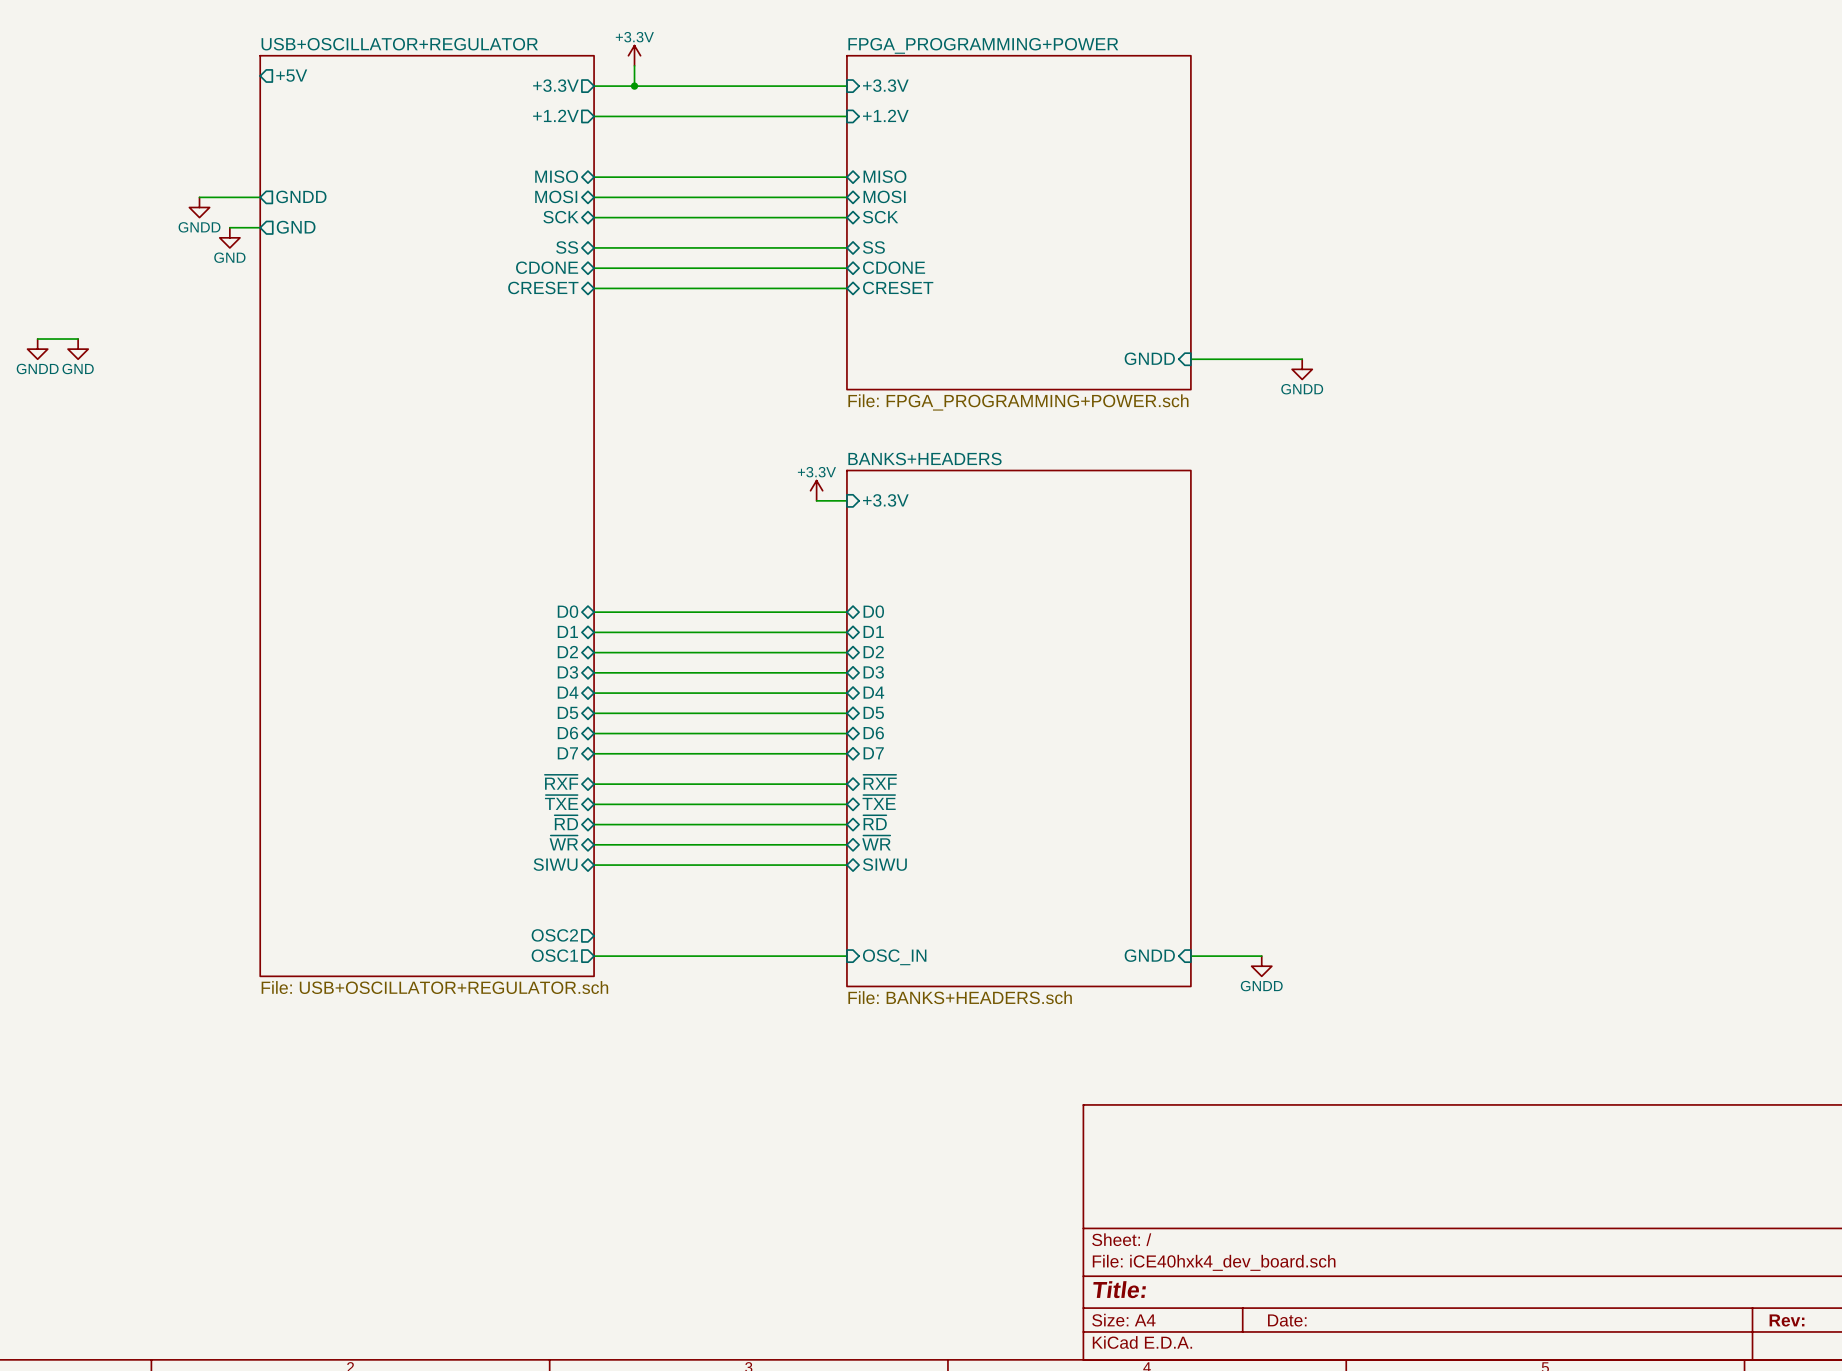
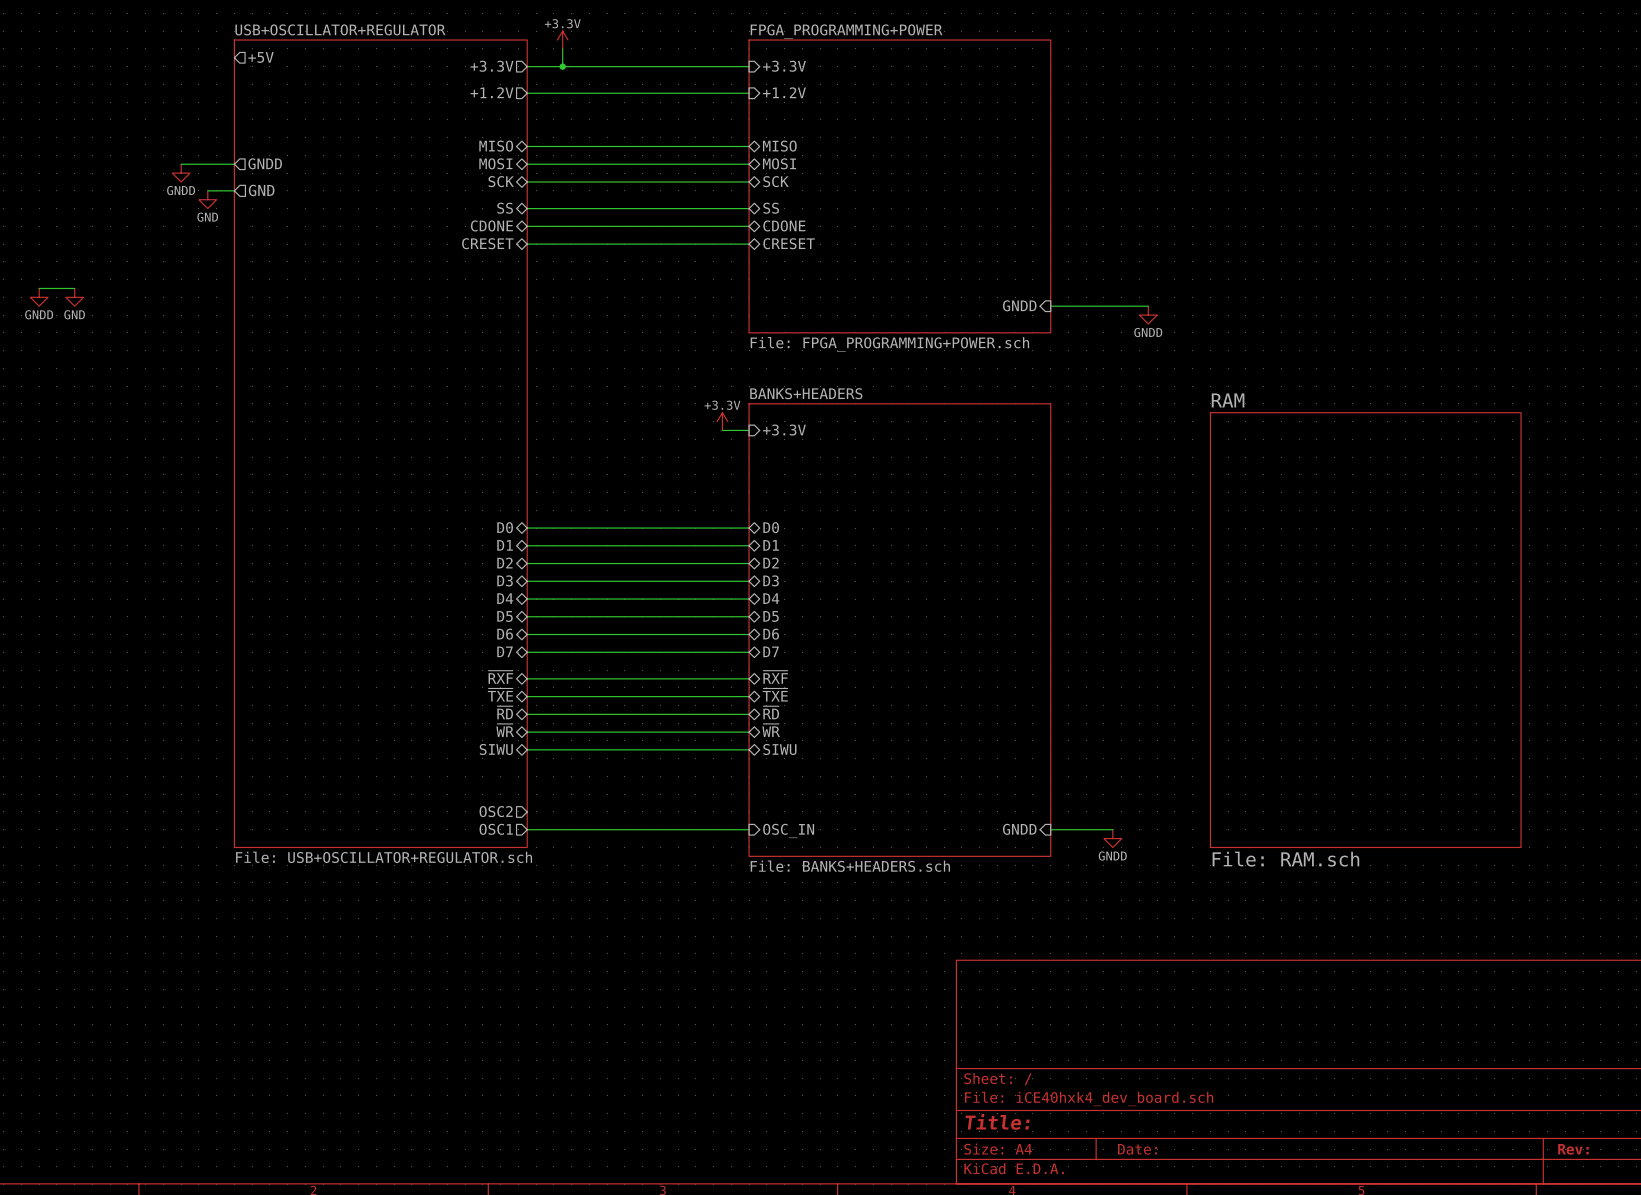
sheet RAM: none -> File: RAM.sch (1365, 630)

